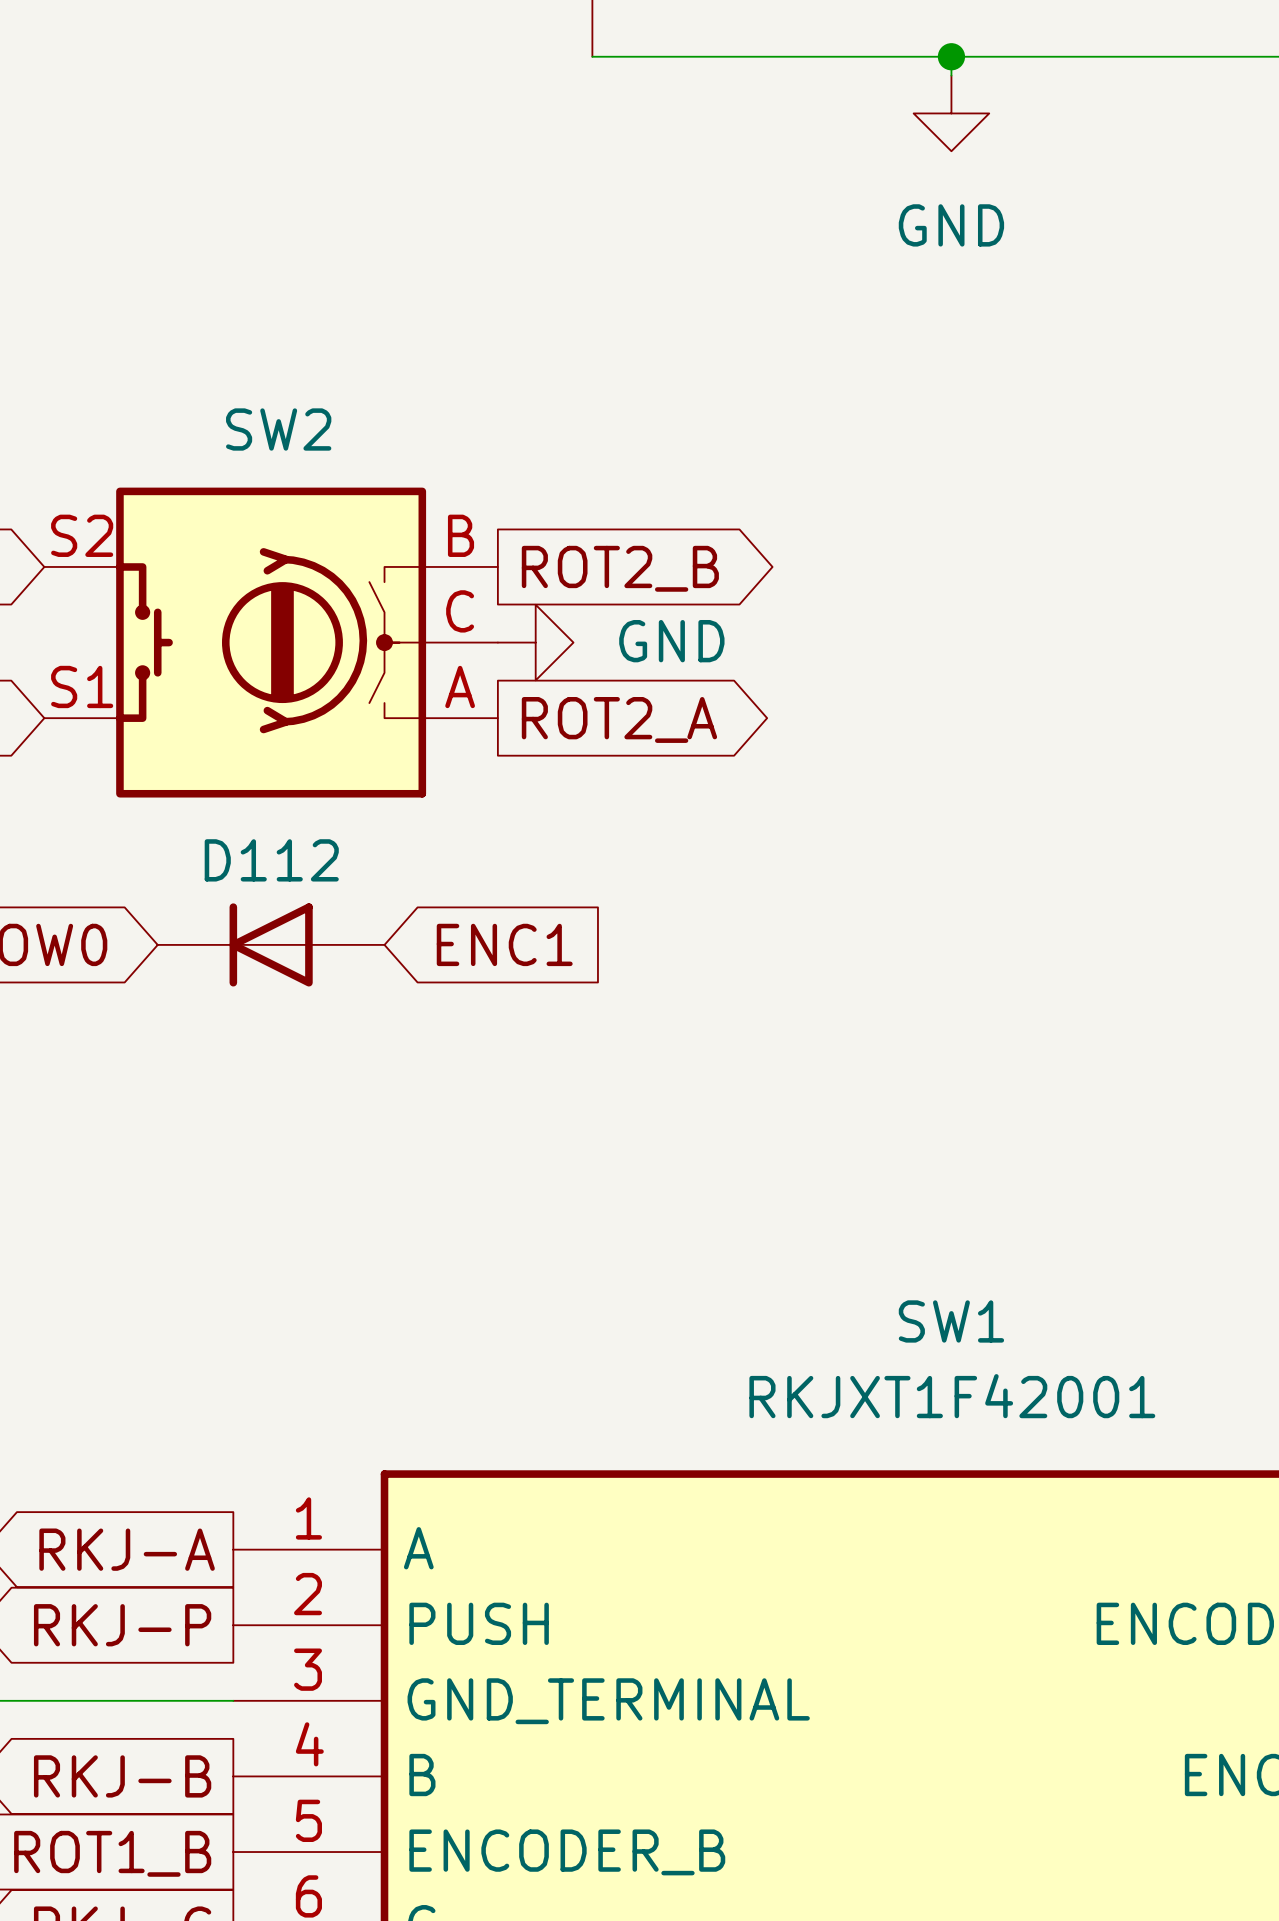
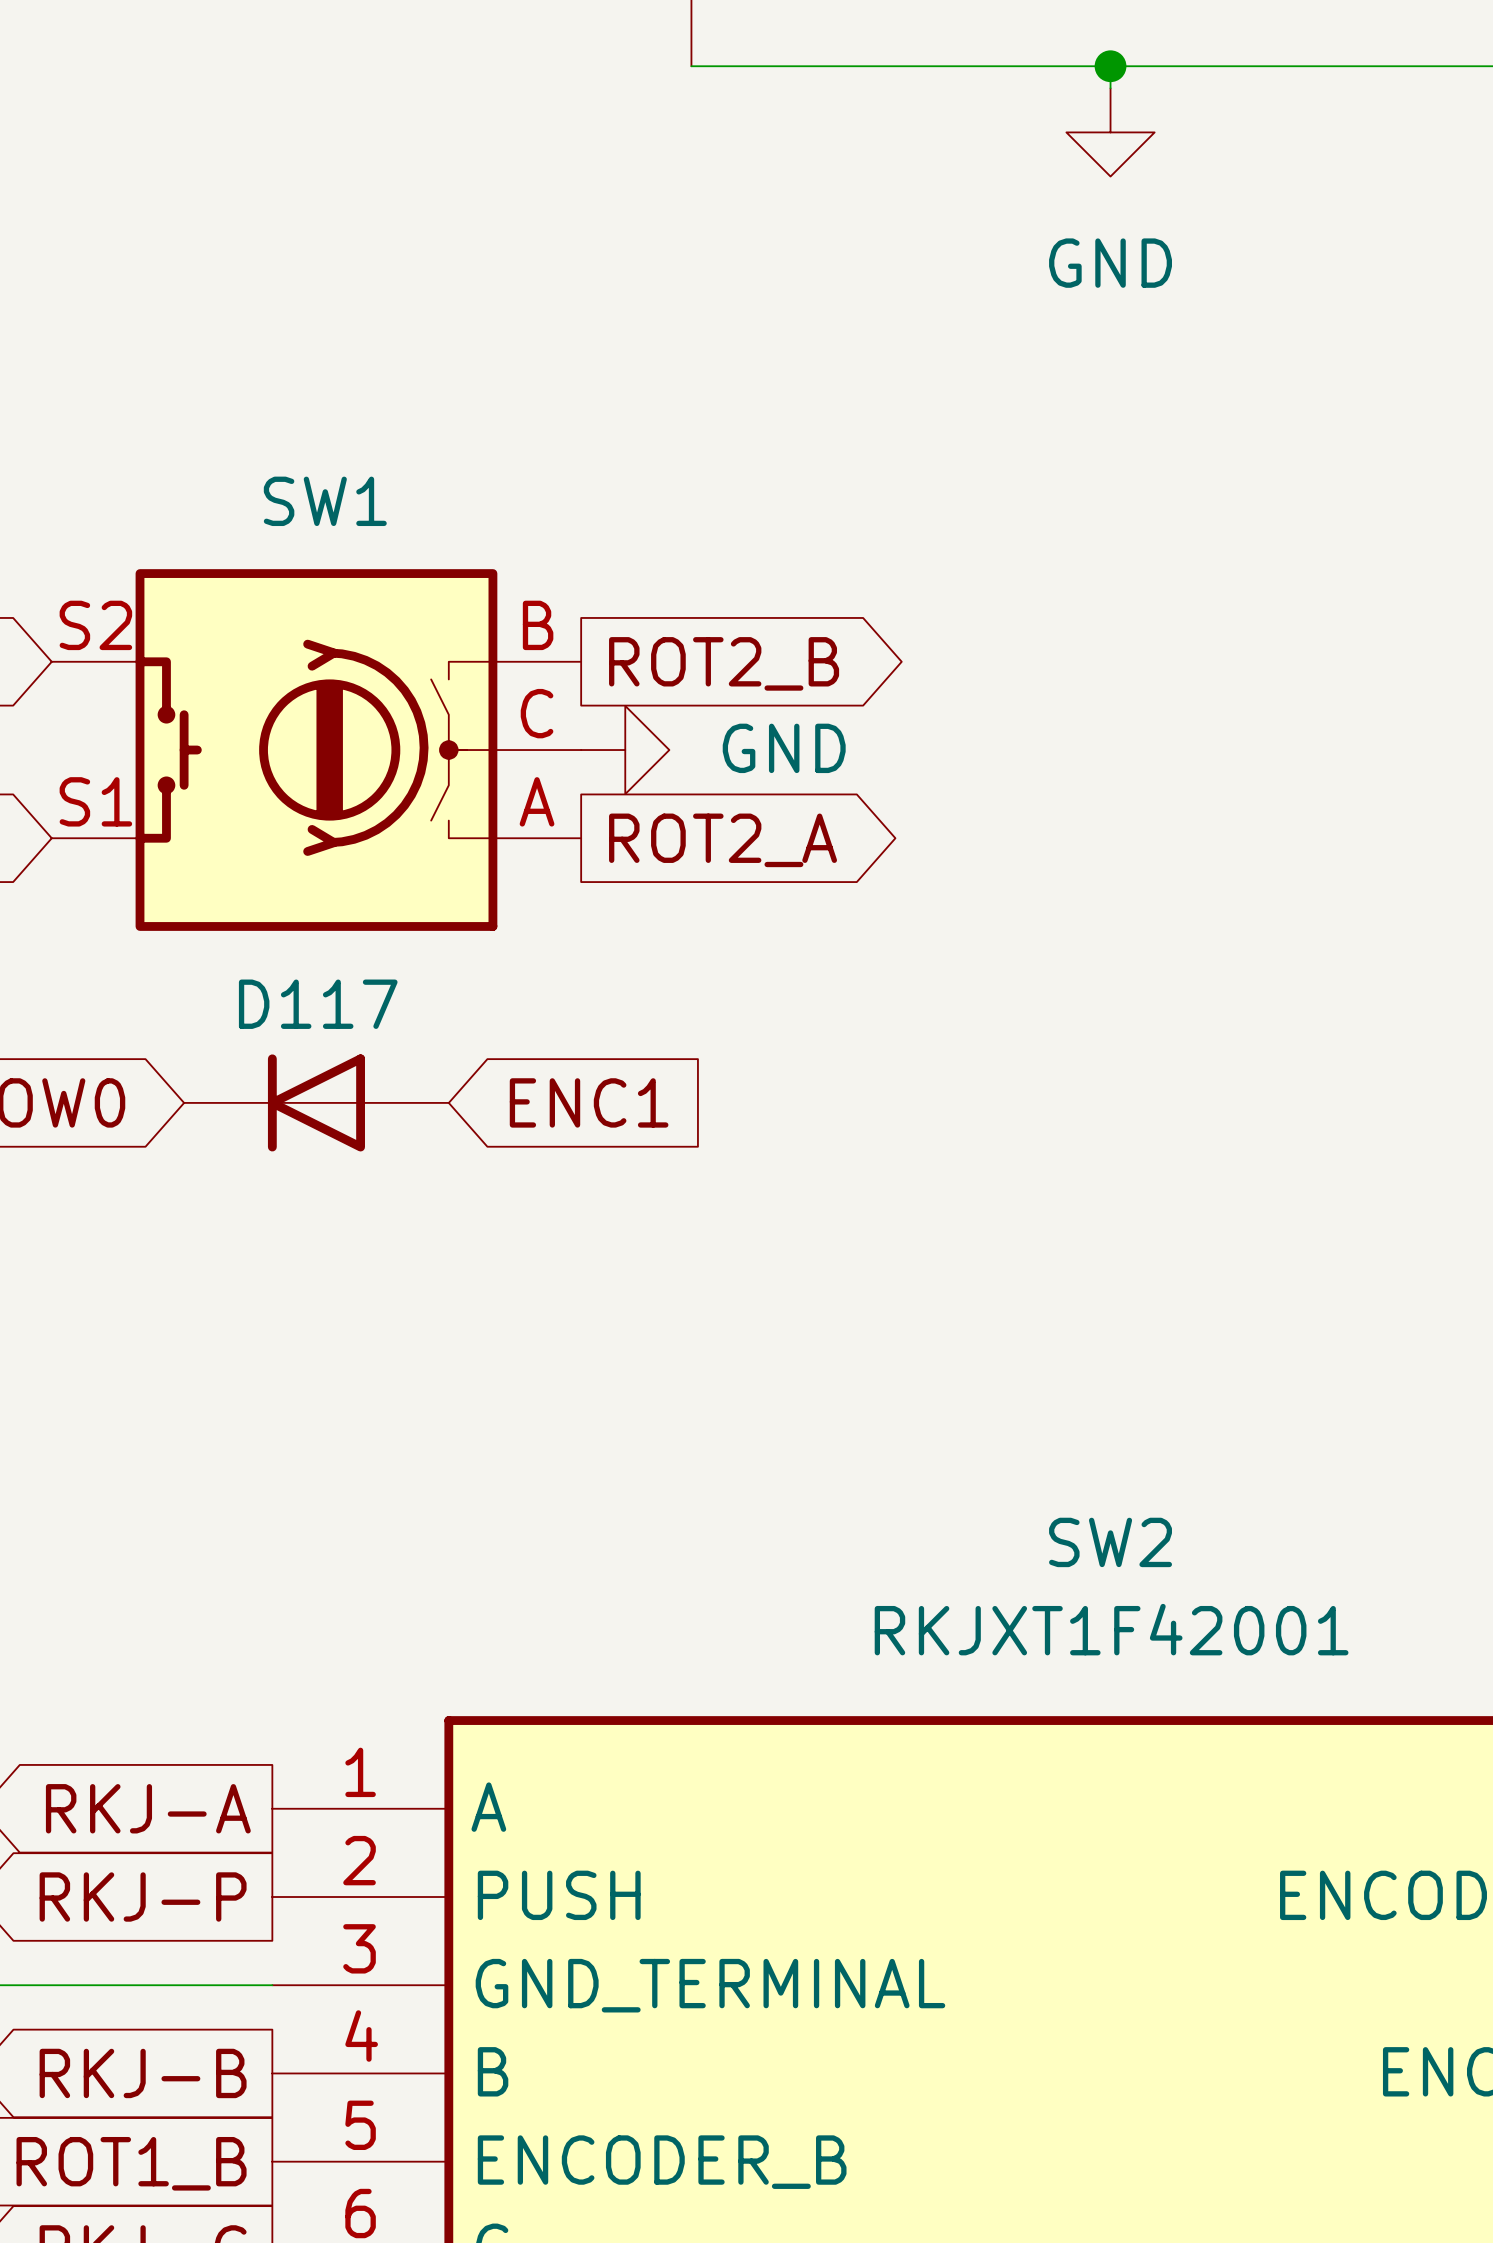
SW2 name: SW2 (278, 429) -> SW1 (325, 501)
D112 name: D112 (271, 860) -> D117 (318, 1004)
SW1 name: SW1 (951, 1321) -> SW2 (1110, 1542)

